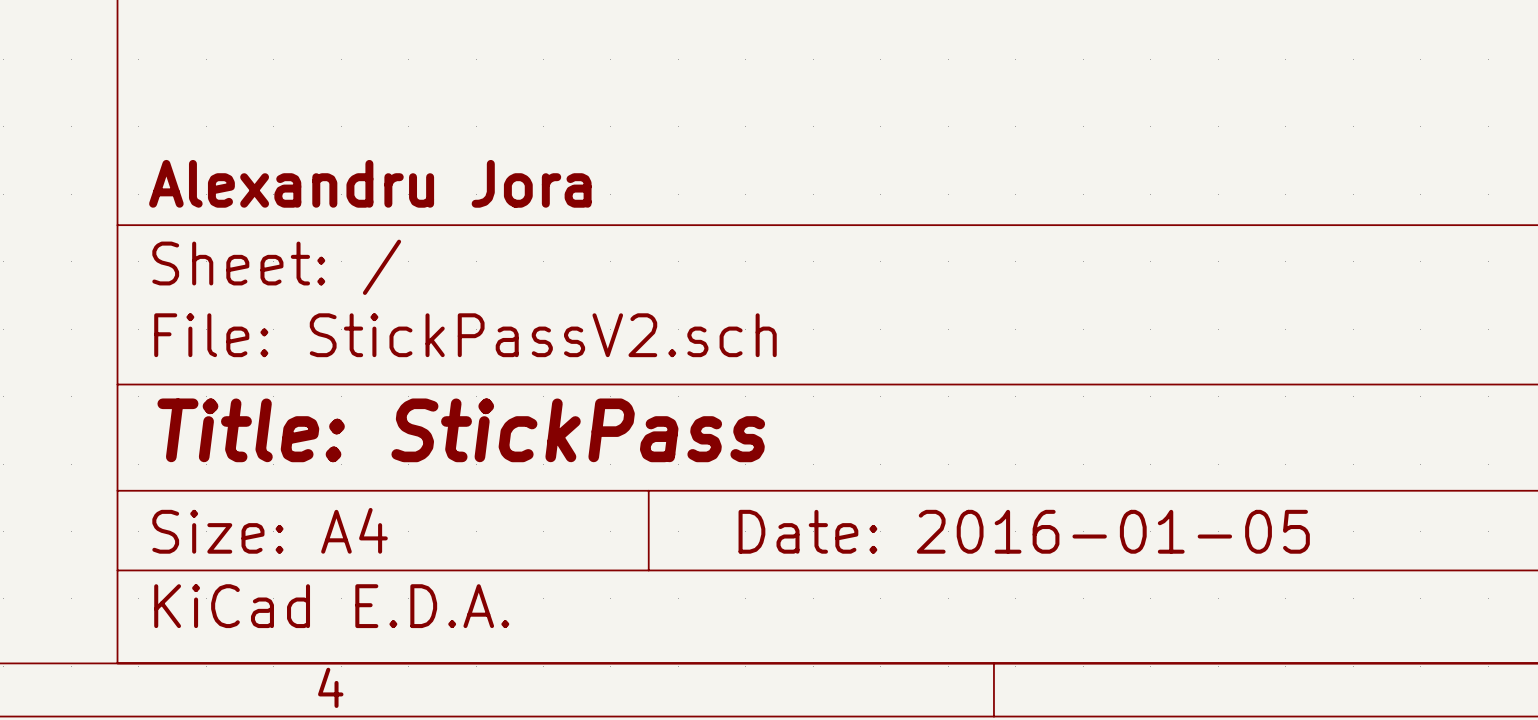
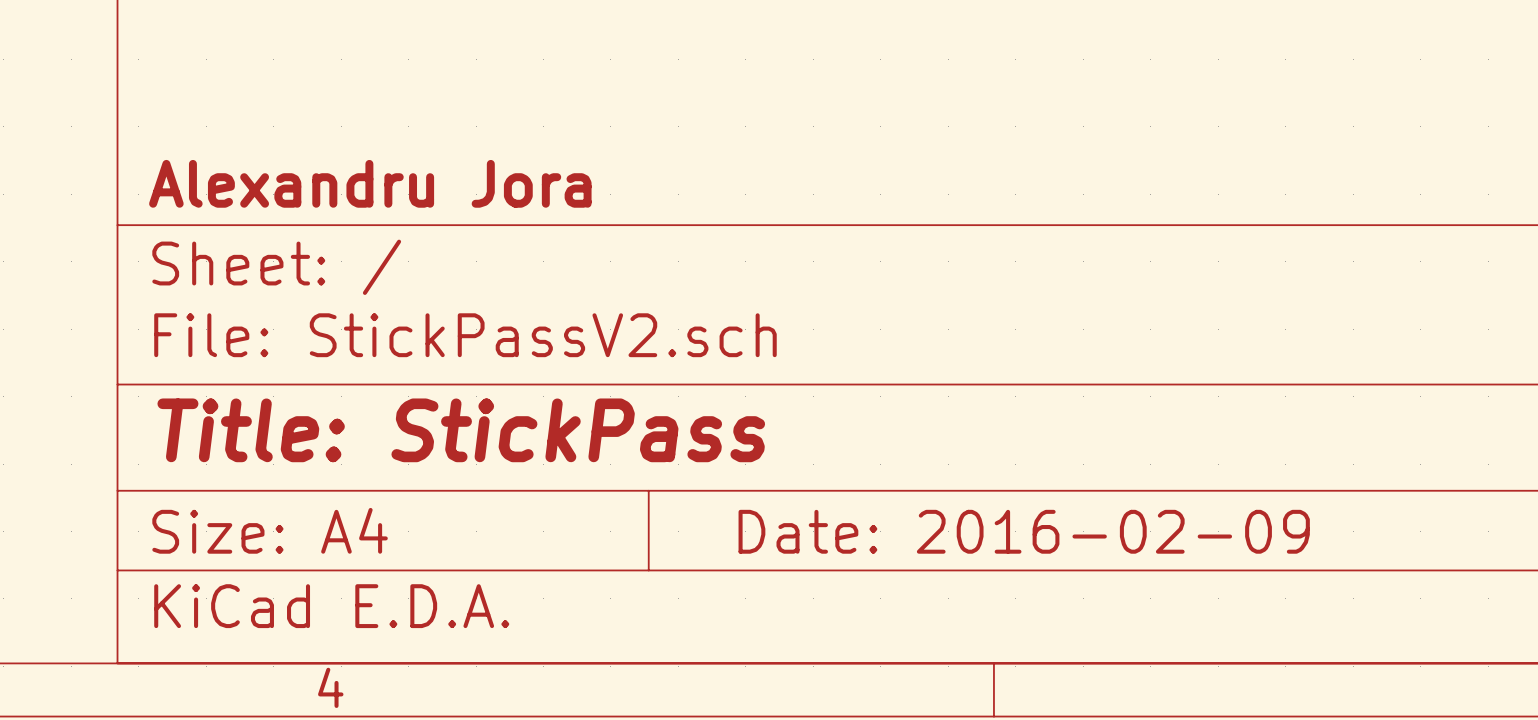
title block: Date: 2016-01-05 (1024, 531) -> Date: 2016-02-09 (1024, 531)

